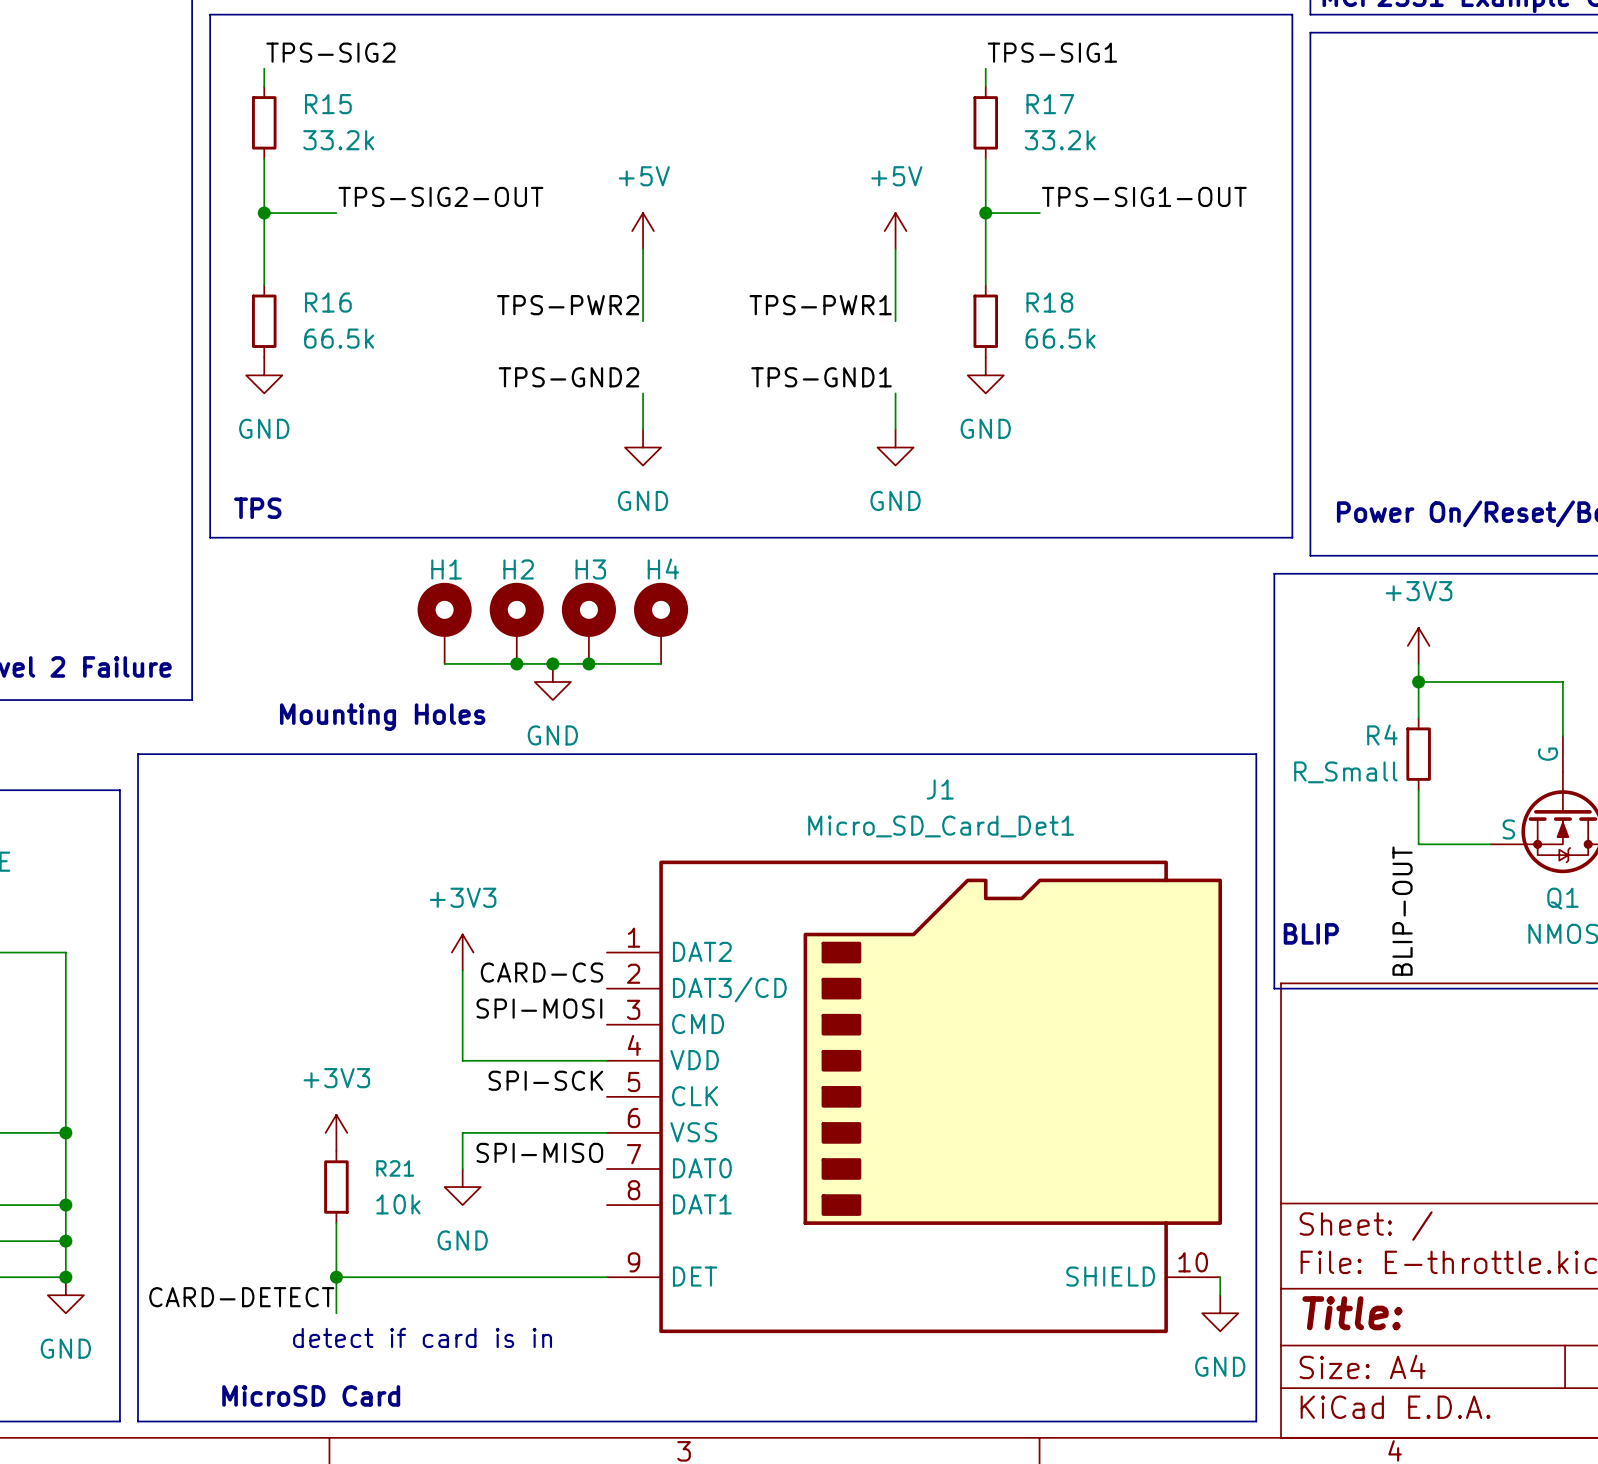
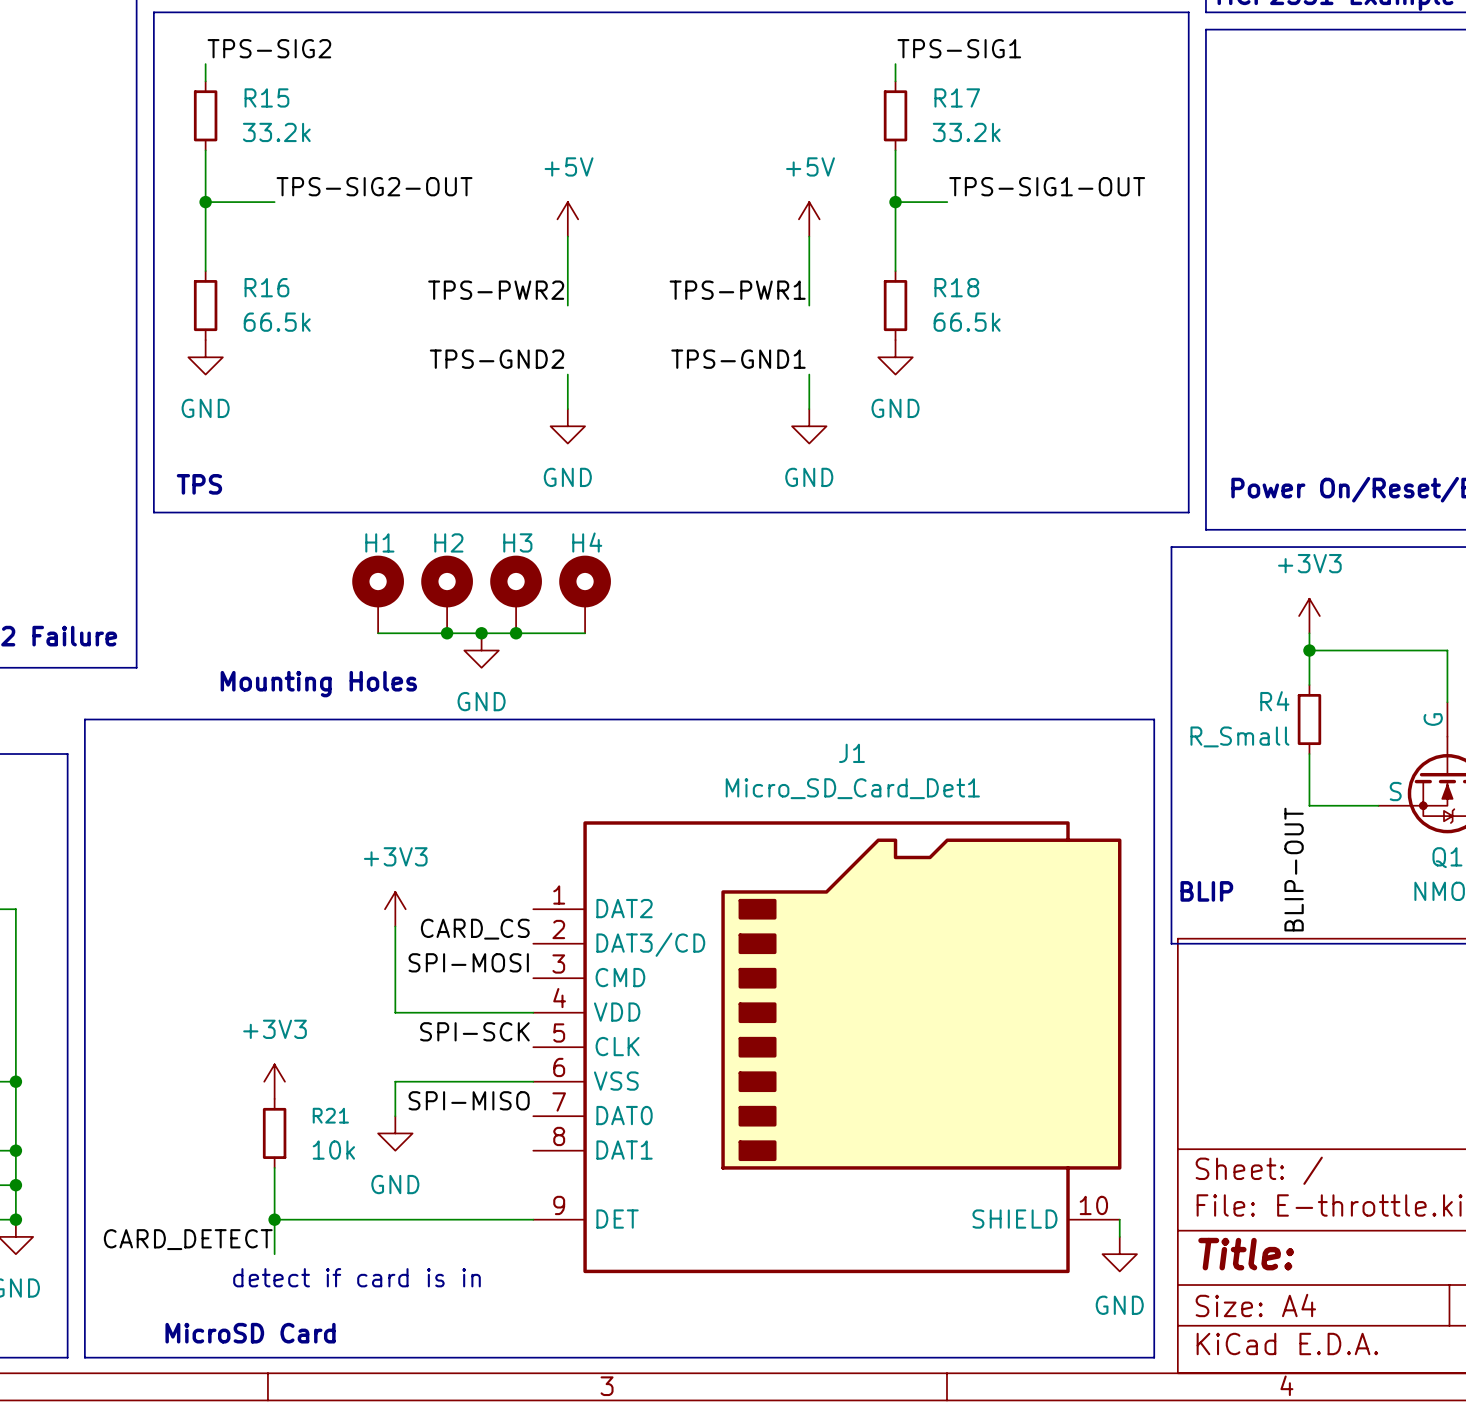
label: CARD-CS (541, 972) -> CARD_CS (475, 929)
label: CARD-DETECT (241, 1297) -> CARD_DETECT (188, 1239)

